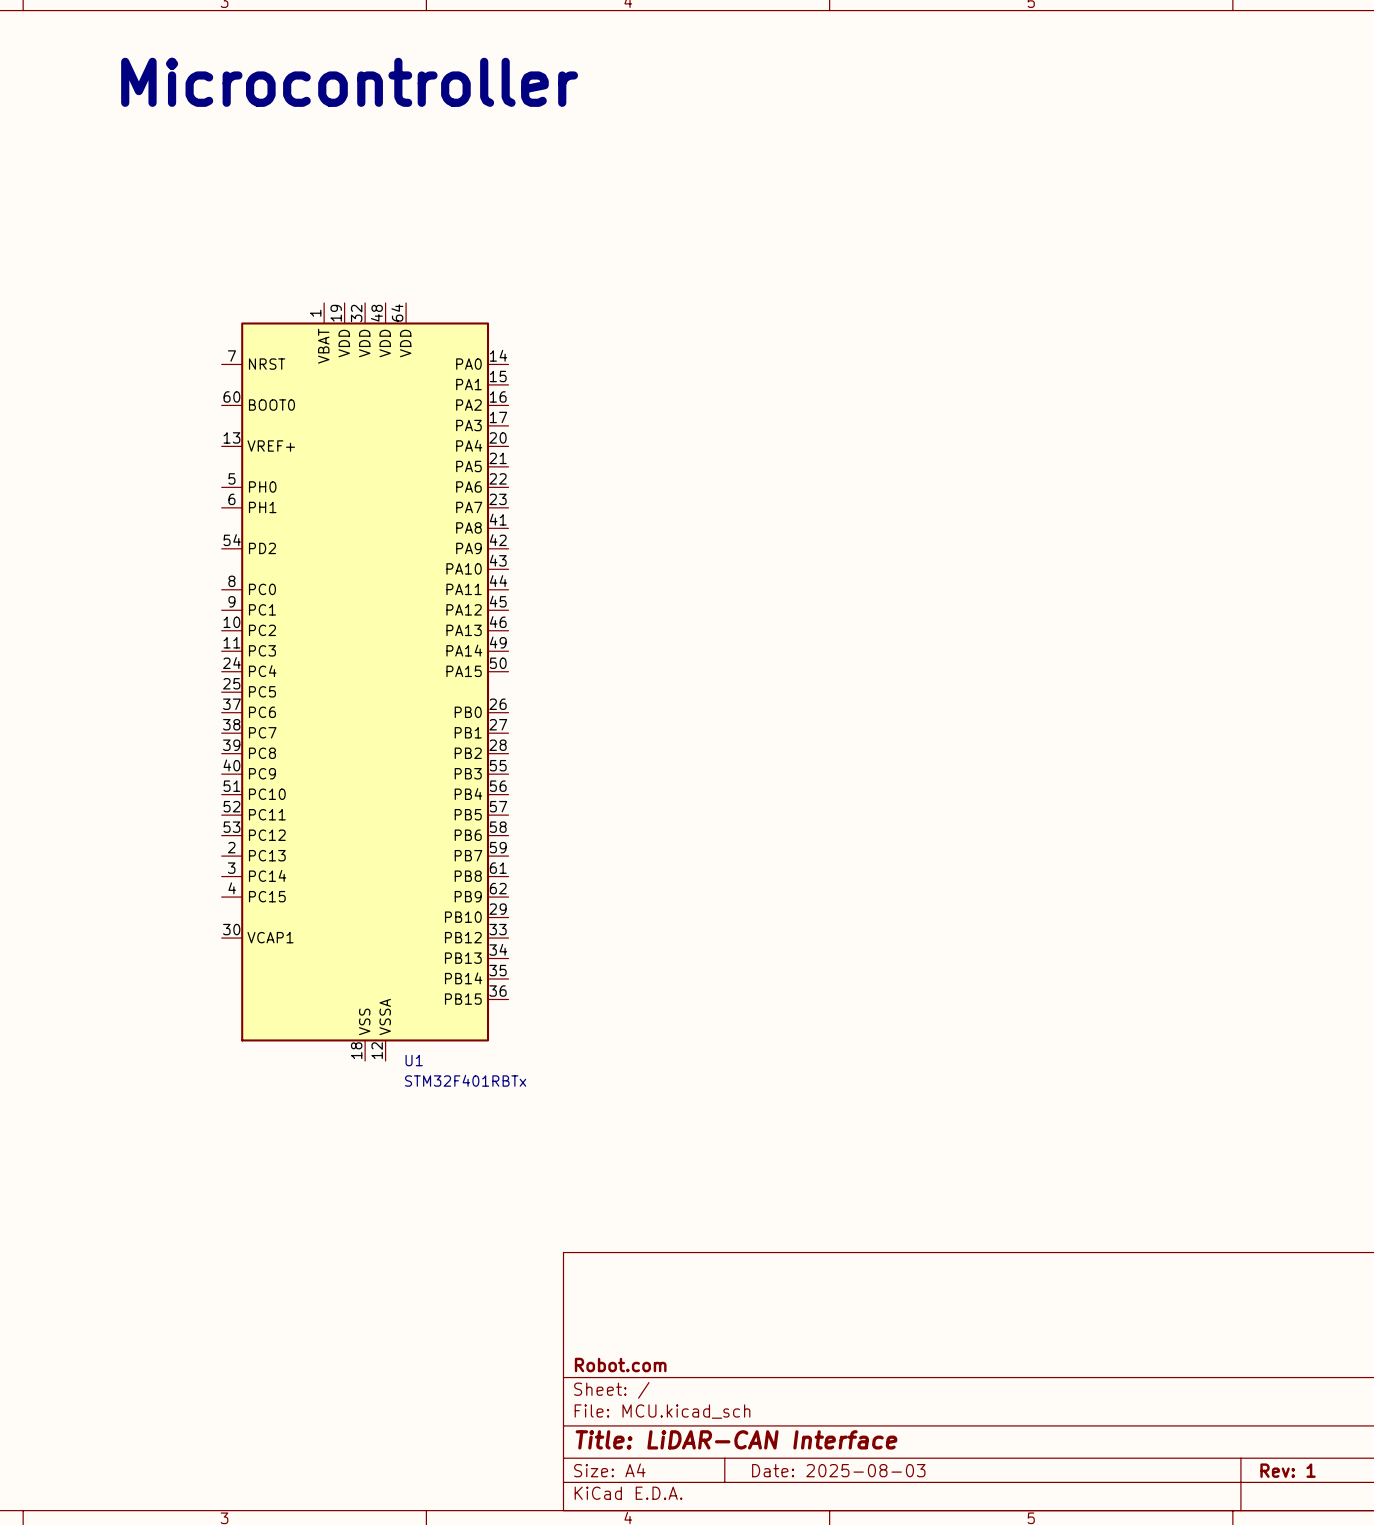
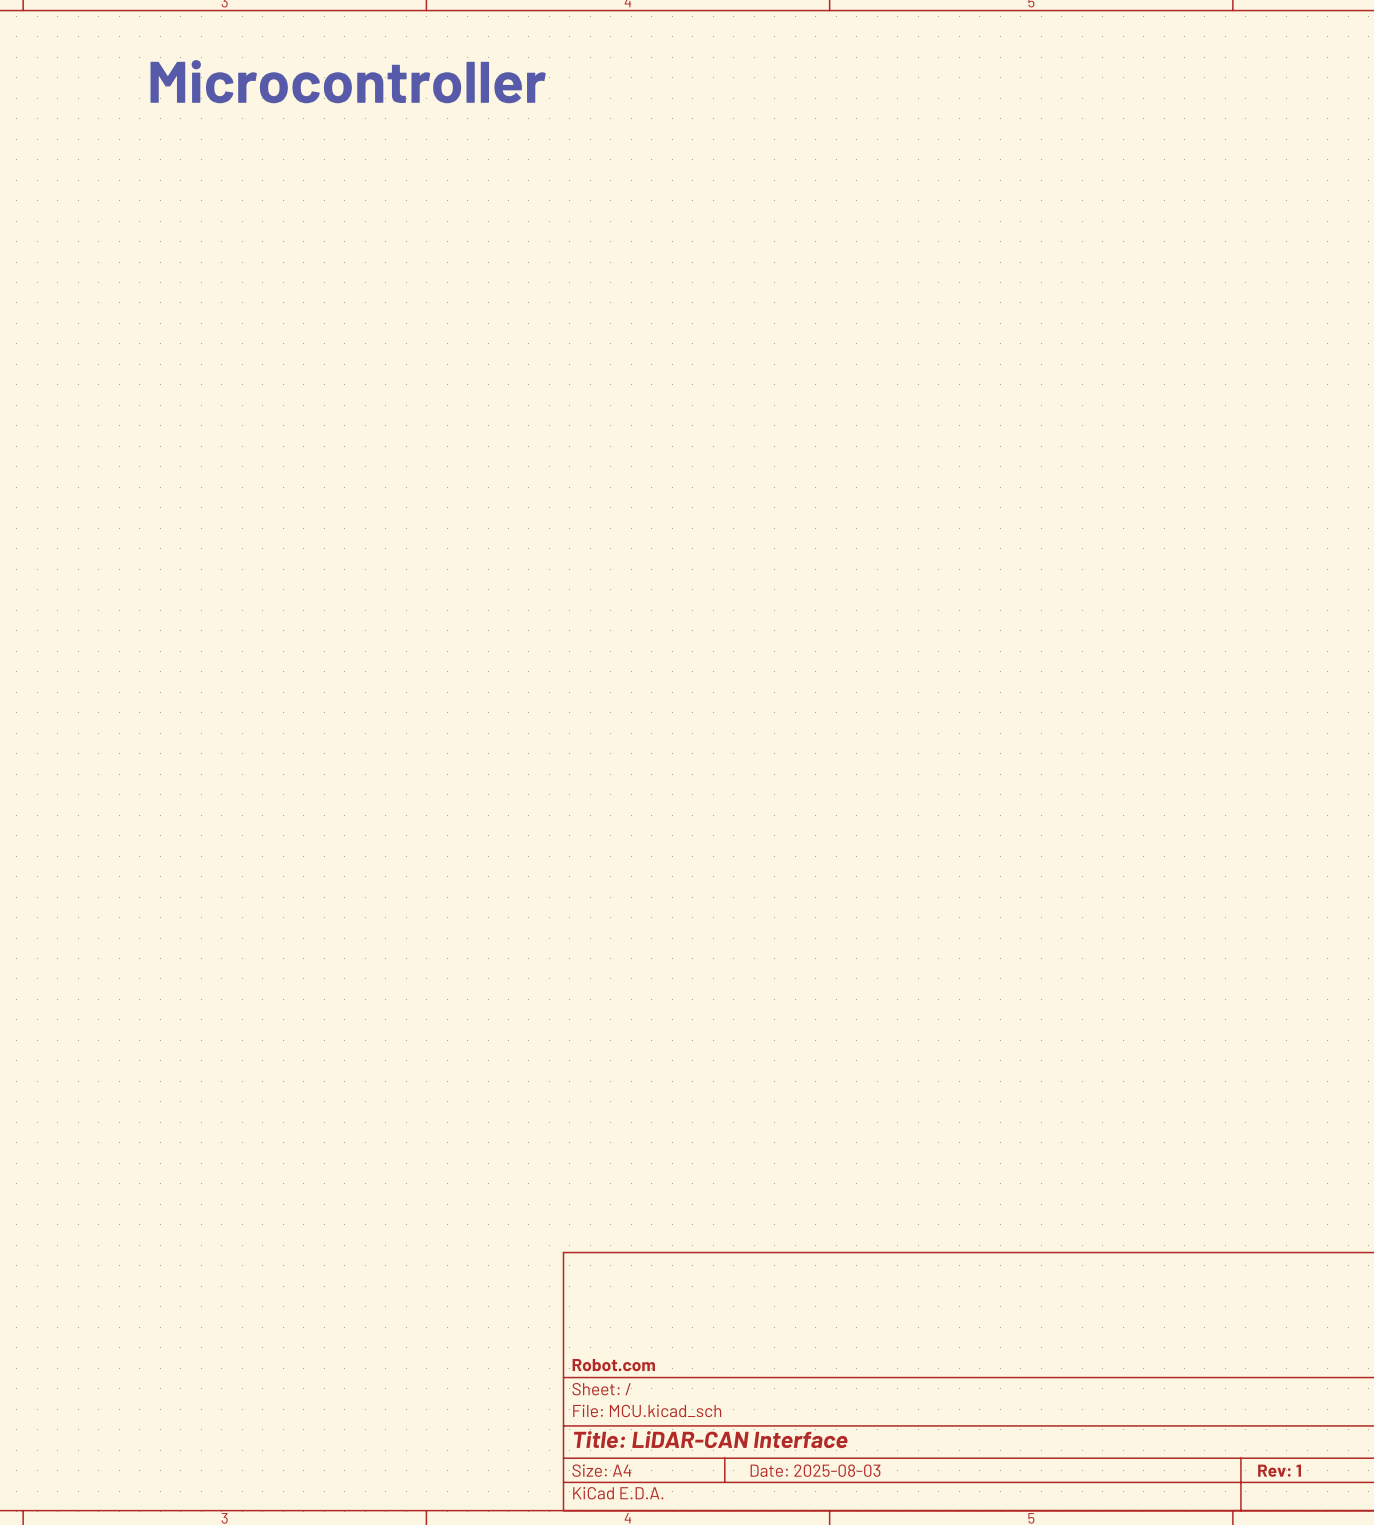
U1: STM32F401RBTx (365, 681) -> none

